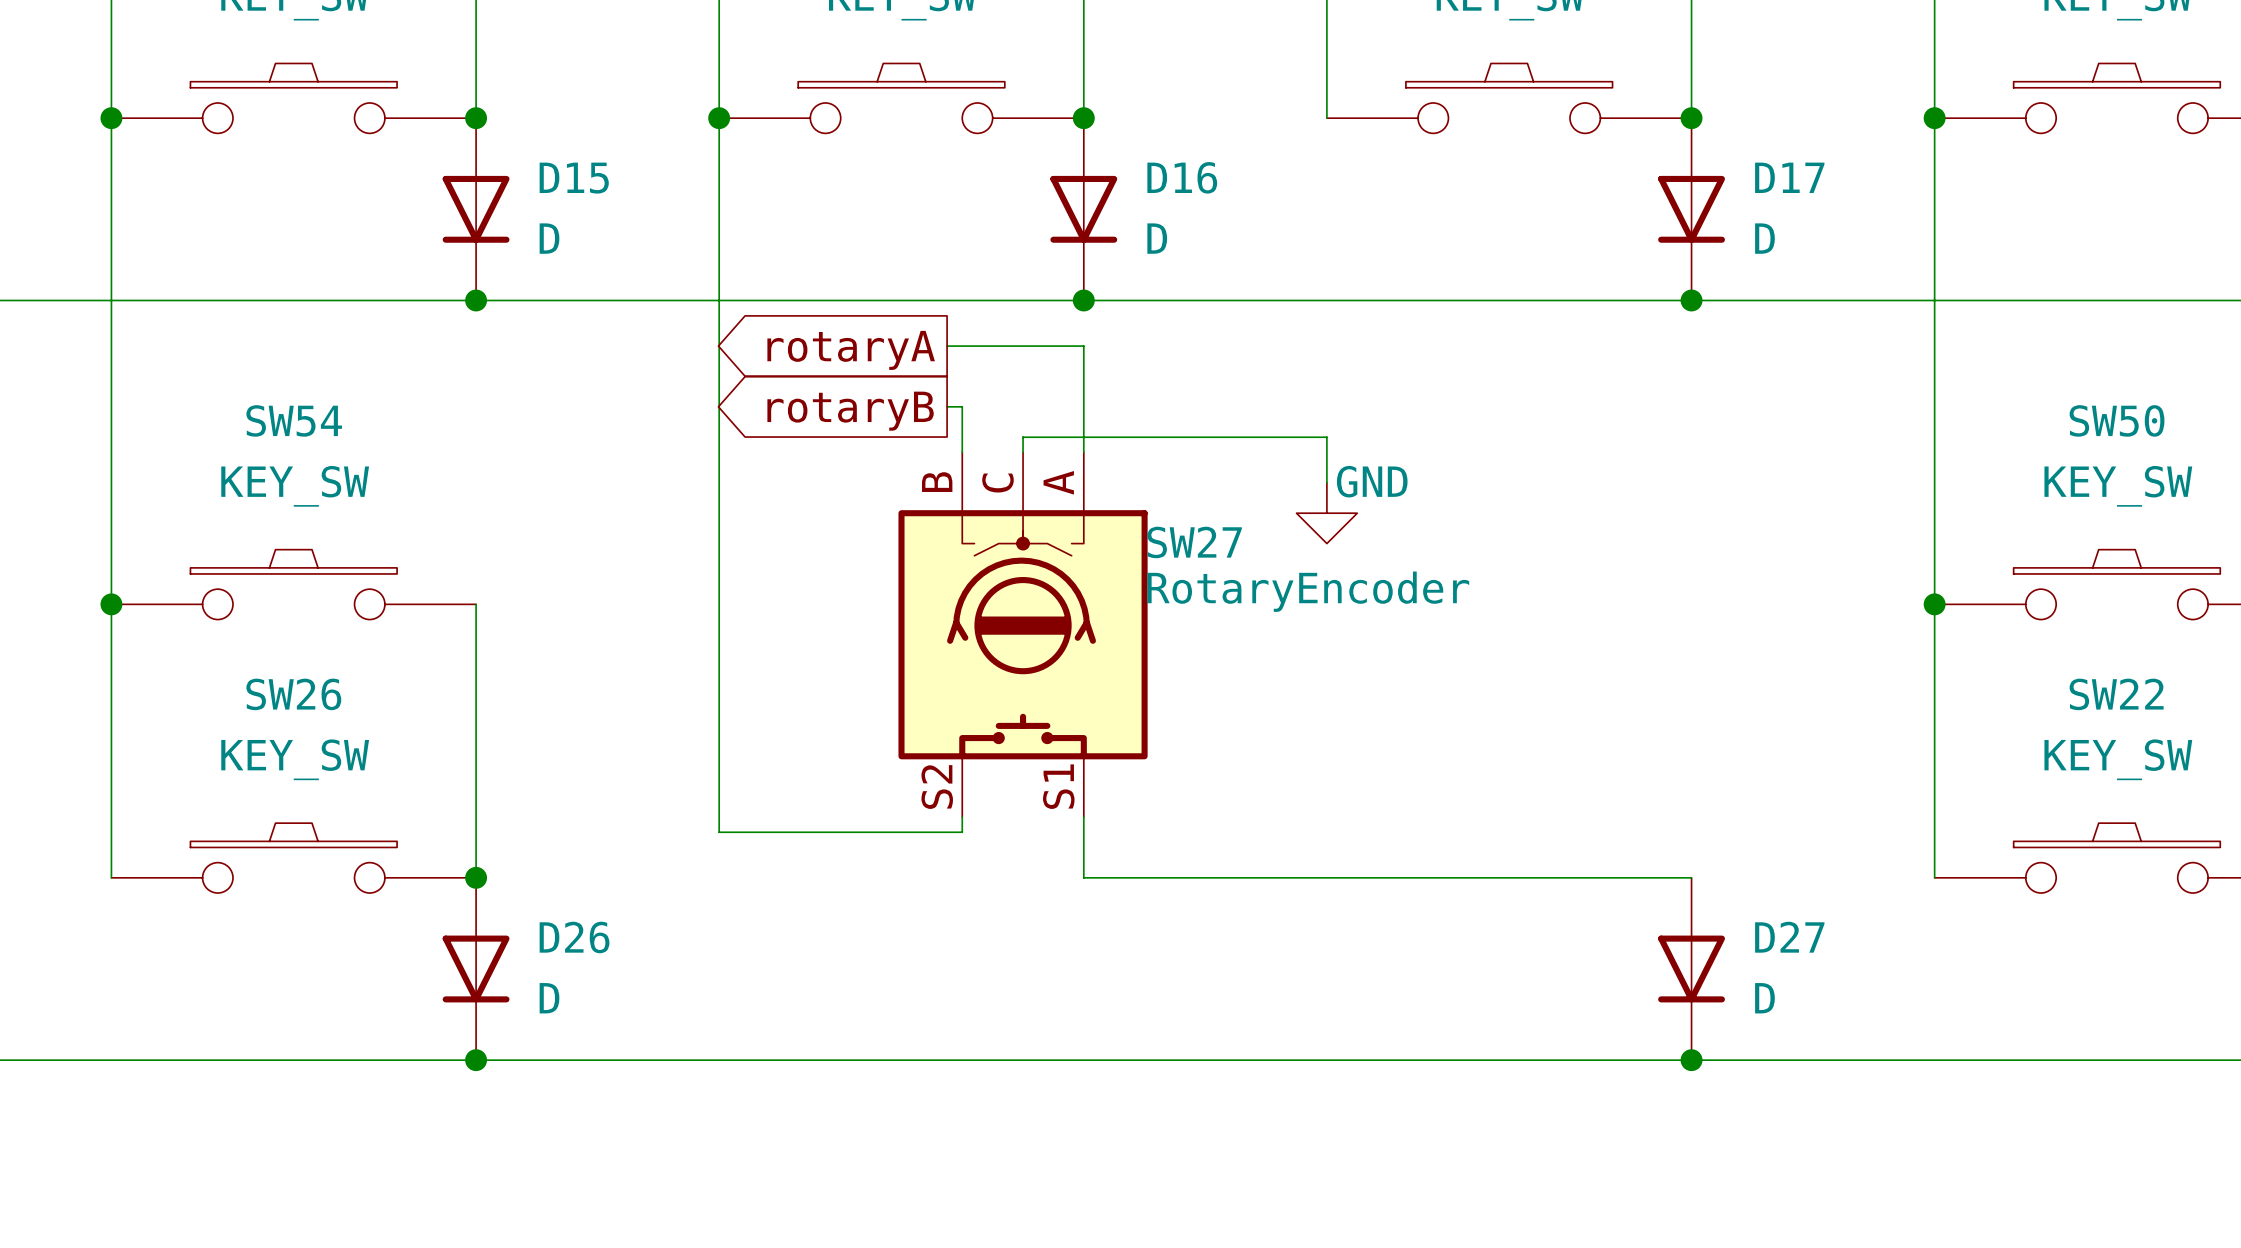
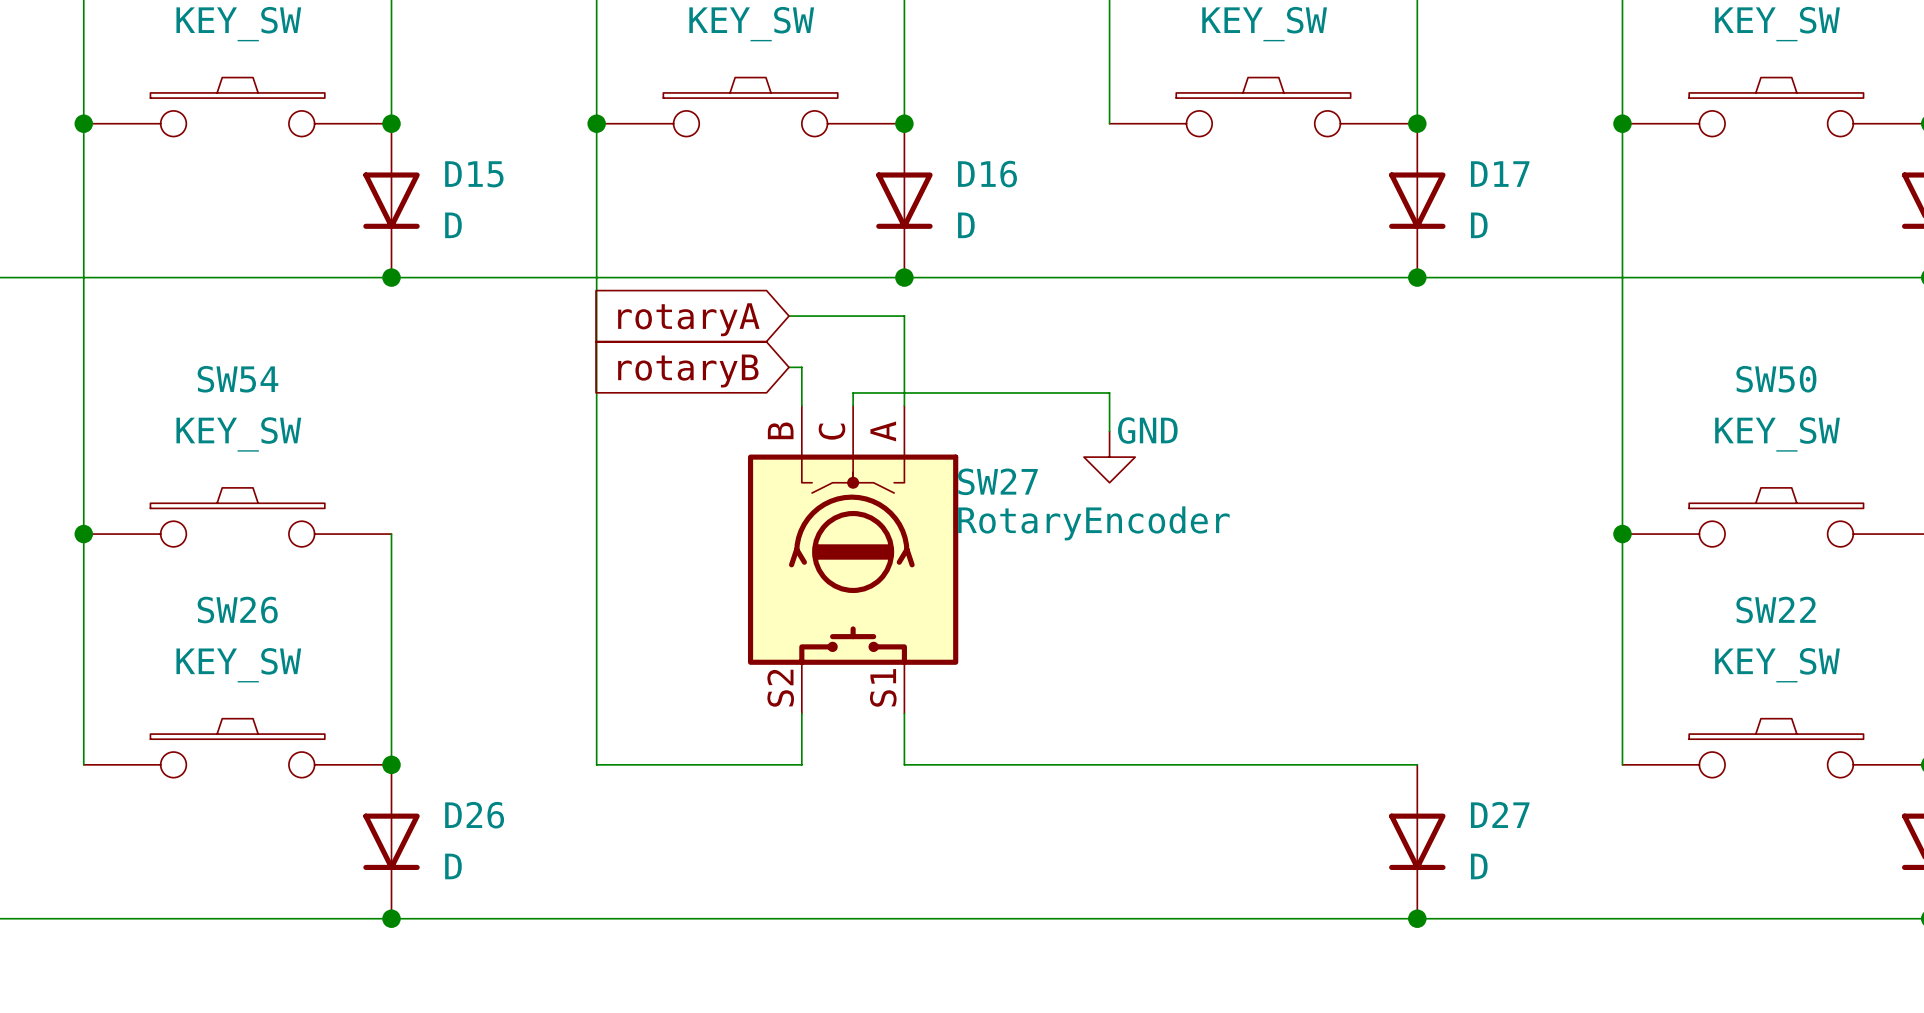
global label shape: output (851, 350) -> input (688, 319)
global label shape: output (850, 411) -> input (688, 371)
wire: (719, 832) (962, 832) -> (596, 726) (596, 764) (801, 764) (801, 726)

